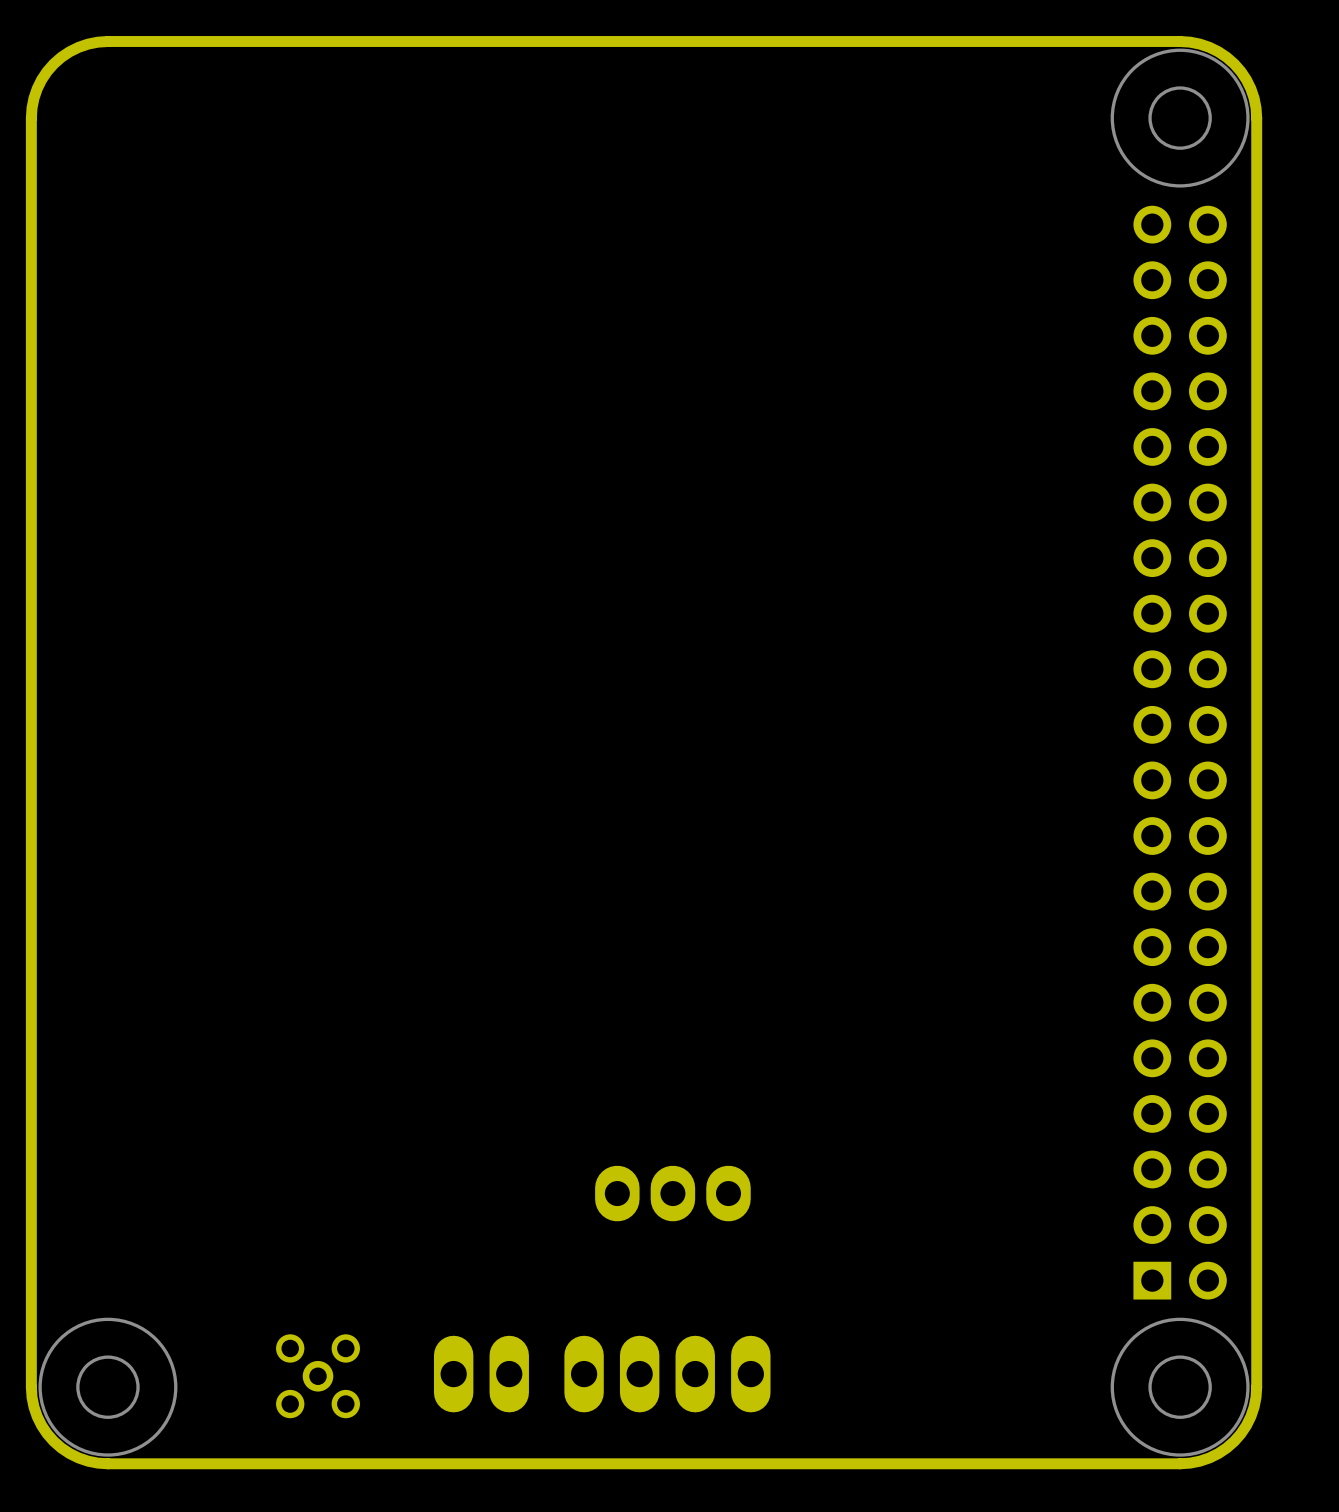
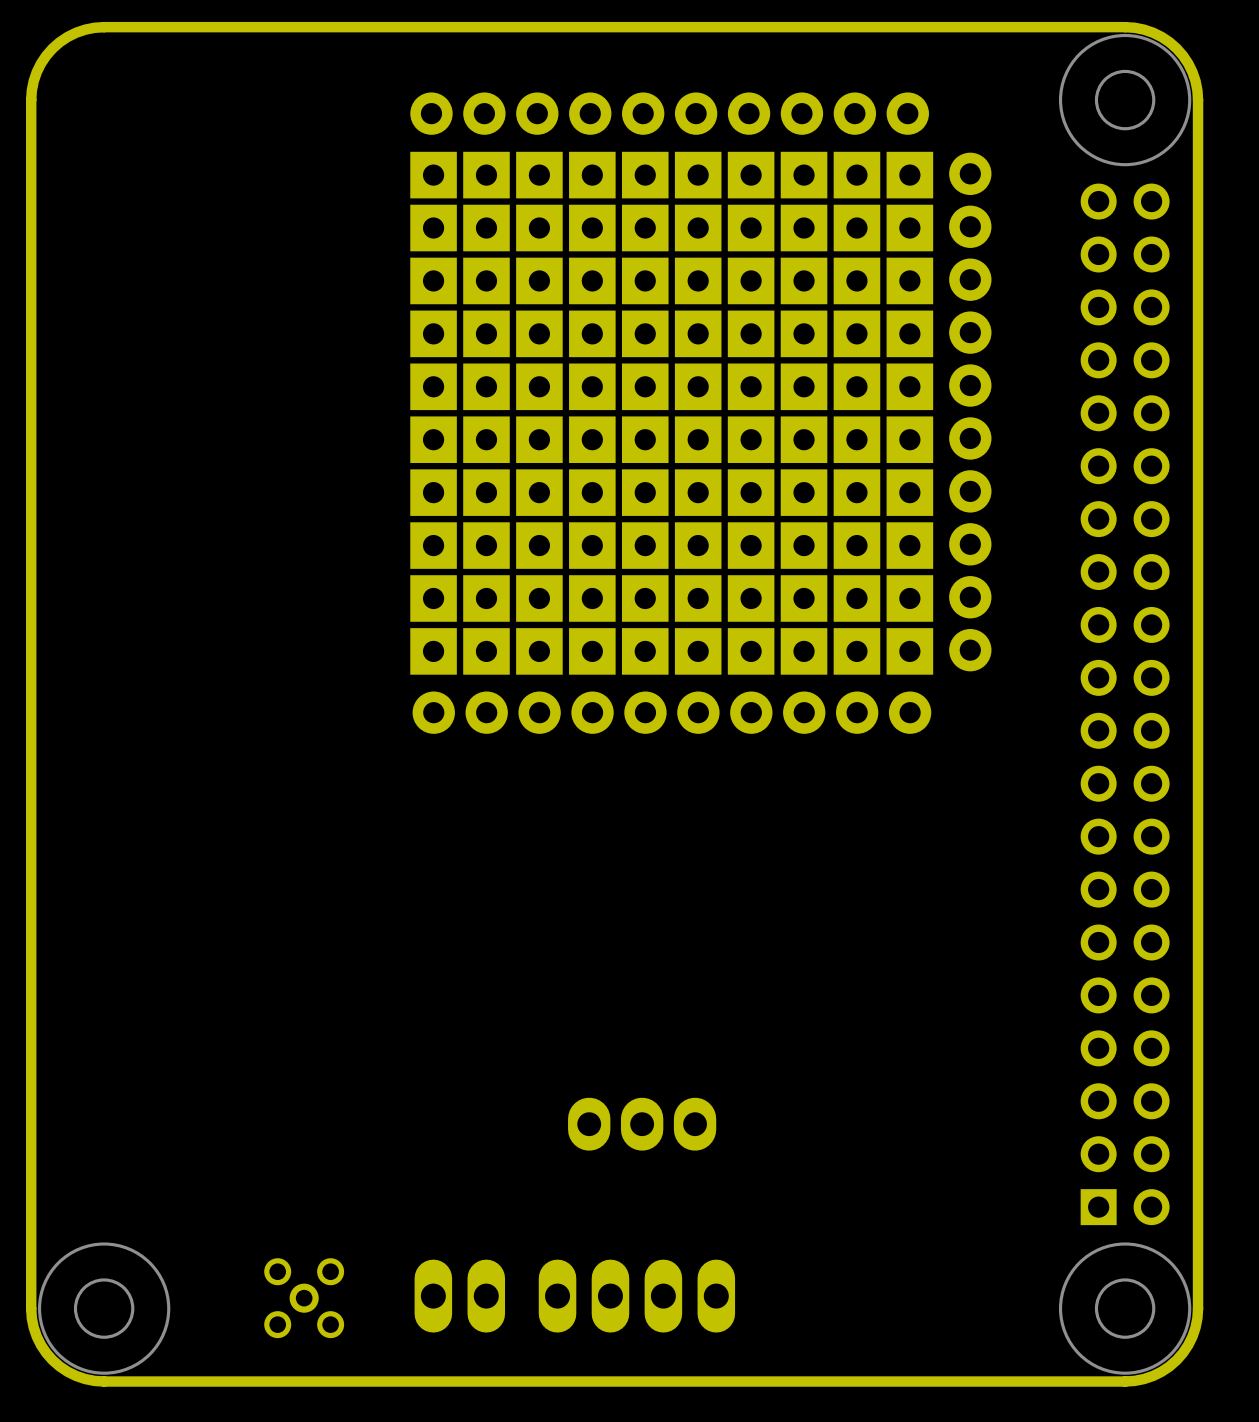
part: none -> (669, 113)
part: none -> (433, 175)
part: none -> (486, 175)
part: none -> (539, 175)
part: none -> (592, 175)
part: none -> (645, 175)
part: none -> (698, 175)
part: none -> (751, 175)
part: none -> (804, 175)
part: none -> (856, 175)
part: none -> (909, 175)
part: none -> (433, 228)
part: none -> (486, 228)
part: none -> (539, 228)
part: none -> (592, 228)
part: none -> (645, 228)
part: none -> (698, 228)
part: none -> (751, 228)
part: none -> (804, 228)
part: none -> (856, 228)
part: none -> (909, 228)
part: none -> (433, 280)
part: none -> (486, 280)
part: none -> (539, 280)
part: none -> (592, 280)
part: none -> (645, 280)
part: none -> (698, 280)
part: none -> (751, 280)
part: none -> (804, 280)
part: none -> (856, 280)
part: none -> (909, 280)
part: none -> (433, 333)
part: none -> (486, 333)
part: none -> (539, 333)
part: none -> (592, 333)
part: none -> (645, 333)
part: none -> (698, 333)
part: none -> (751, 333)
part: none -> (804, 333)
part: none -> (856, 333)
part: none -> (909, 333)
part: none -> (433, 386)
part: none -> (486, 386)
part: none -> (539, 386)
part: none -> (592, 386)
part: none -> (645, 386)
part: none -> (698, 386)
part: none -> (751, 386)
part: none -> (804, 386)
part: none -> (856, 386)
part: none -> (909, 386)
part: none -> (970, 412)
part: none -> (433, 439)
part: none -> (486, 439)
part: none -> (539, 439)
part: none -> (592, 439)
part: none -> (645, 439)
part: none -> (698, 439)
part: none -> (751, 439)
part: none -> (804, 439)
part: none -> (856, 439)
part: none -> (909, 439)
part: none -> (433, 492)
part: none -> (486, 492)
part: none -> (539, 492)
part: none -> (592, 492)
part: none -> (645, 492)
part: none -> (698, 492)
part: none -> (751, 492)
part: none -> (804, 492)
part: none -> (856, 492)
part: none -> (909, 492)
part: none -> (433, 545)
part: none -> (486, 545)
part: none -> (539, 545)
part: none -> (592, 545)
part: none -> (645, 545)
part: none -> (698, 545)
part: none -> (751, 545)
part: none -> (804, 545)
part: none -> (856, 545)
part: none -> (909, 545)
part: none -> (433, 598)
part: none -> (486, 598)
part: none -> (539, 598)
part: none -> (592, 598)
part: none -> (645, 598)
part: none -> (698, 598)
part: none -> (751, 598)
part: none -> (804, 598)
part: none -> (856, 598)
part: none -> (909, 598)
part: none -> (433, 651)
part: none -> (486, 651)
part: none -> (539, 651)
part: none -> (592, 651)
part: none -> (645, 651)
part: none -> (698, 651)
part: none -> (751, 651)
part: none -> (804, 651)
part: none -> (856, 651)
part: none -> (909, 651)
part: none -> (671, 712)

